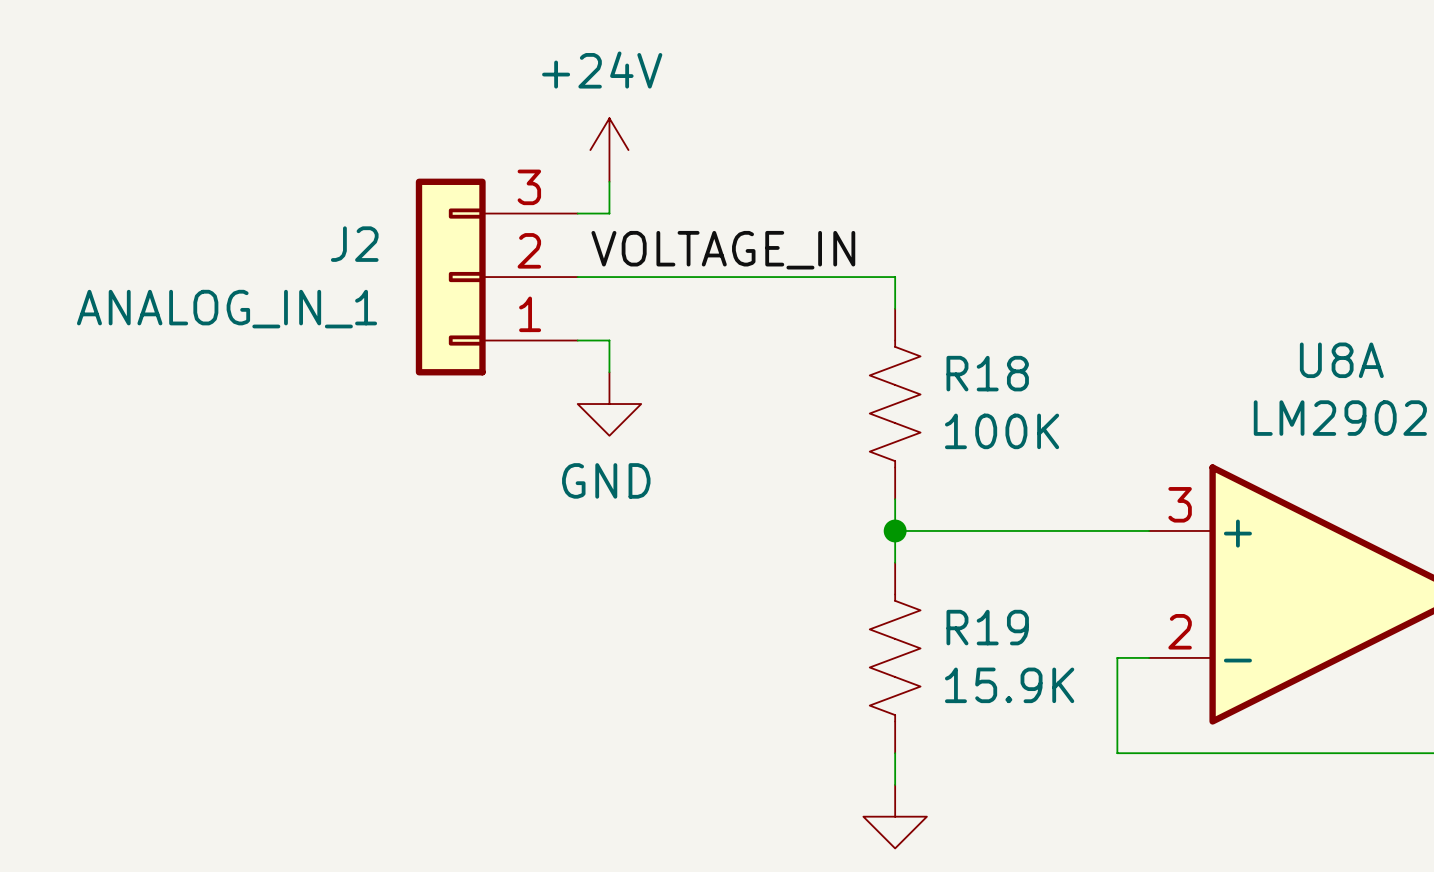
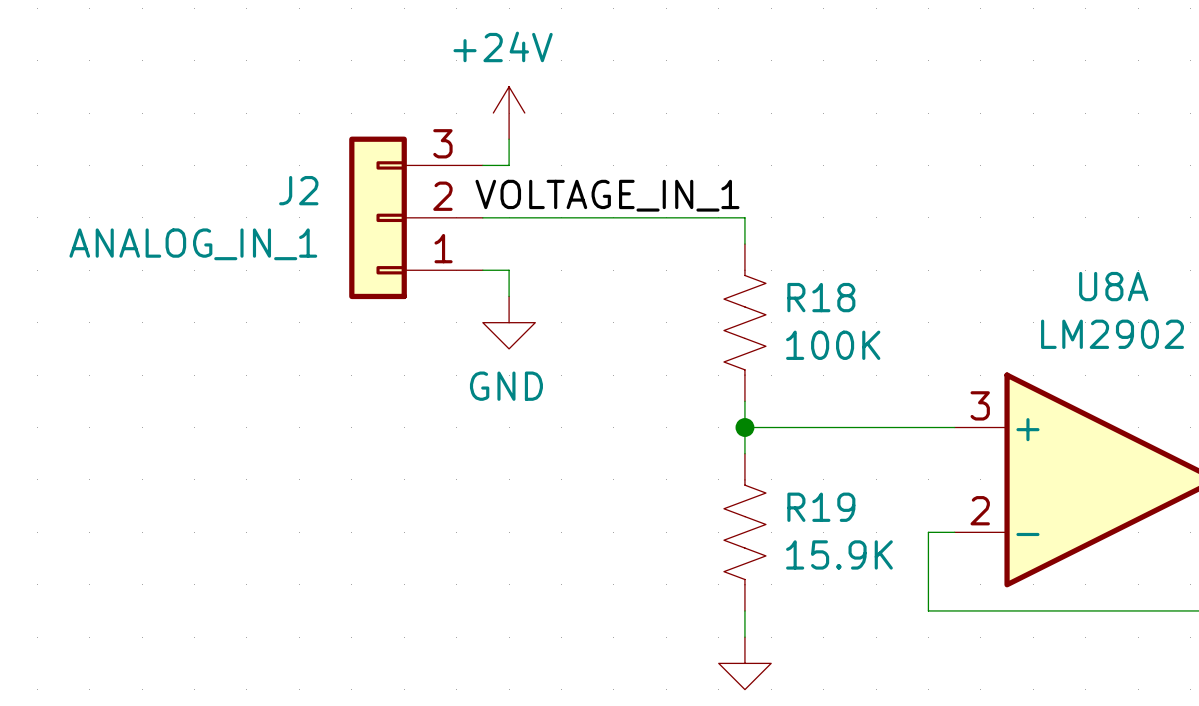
label: VOLTAGE_IN (723, 250) -> VOLTAGE_IN_1 (607, 195)

